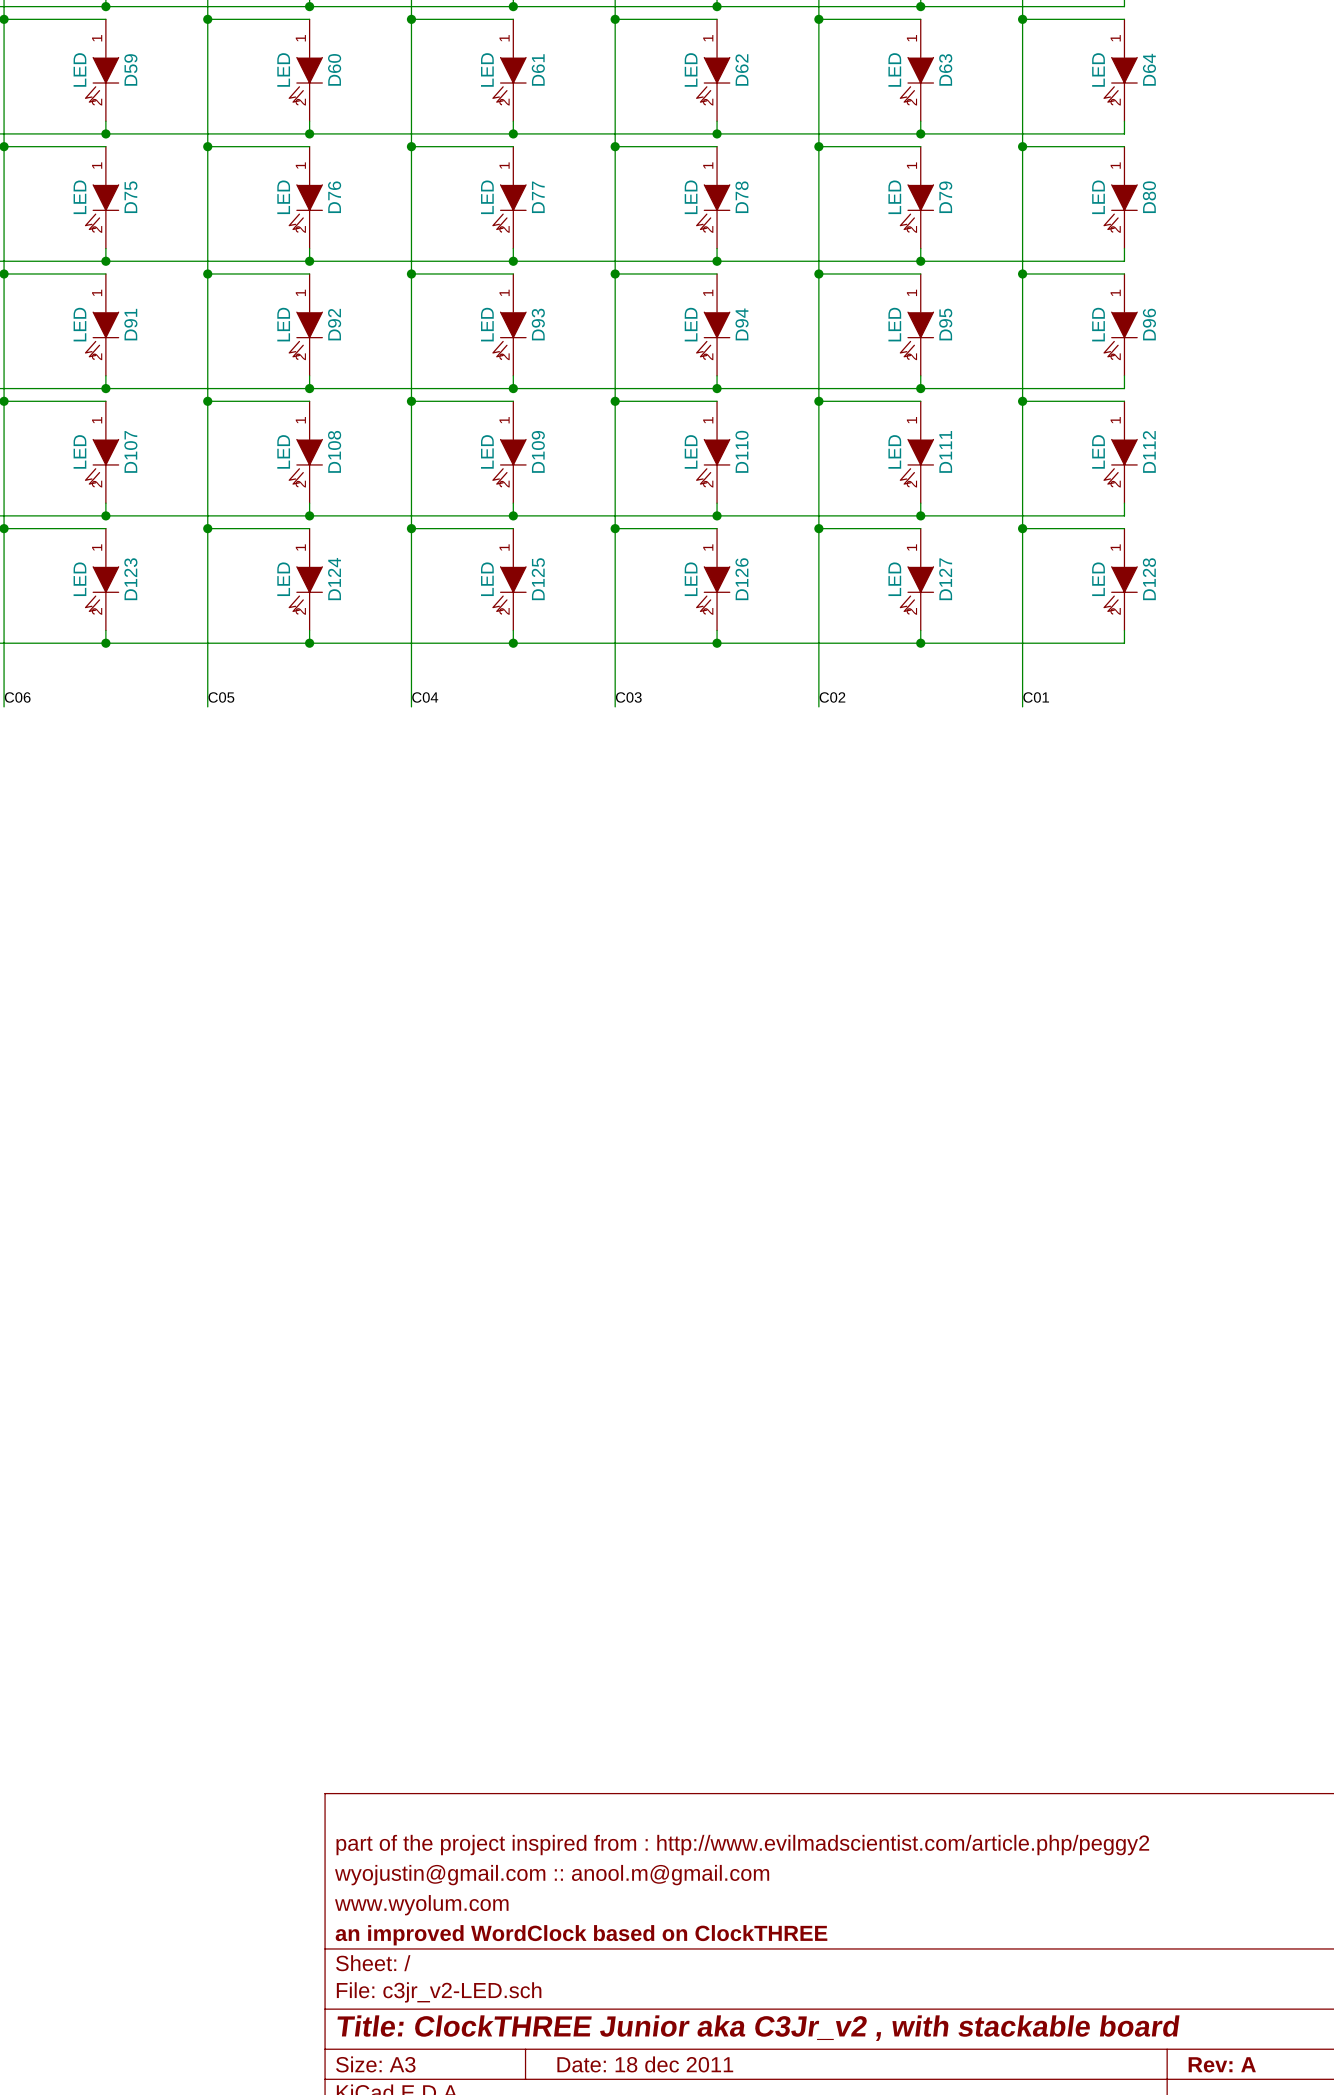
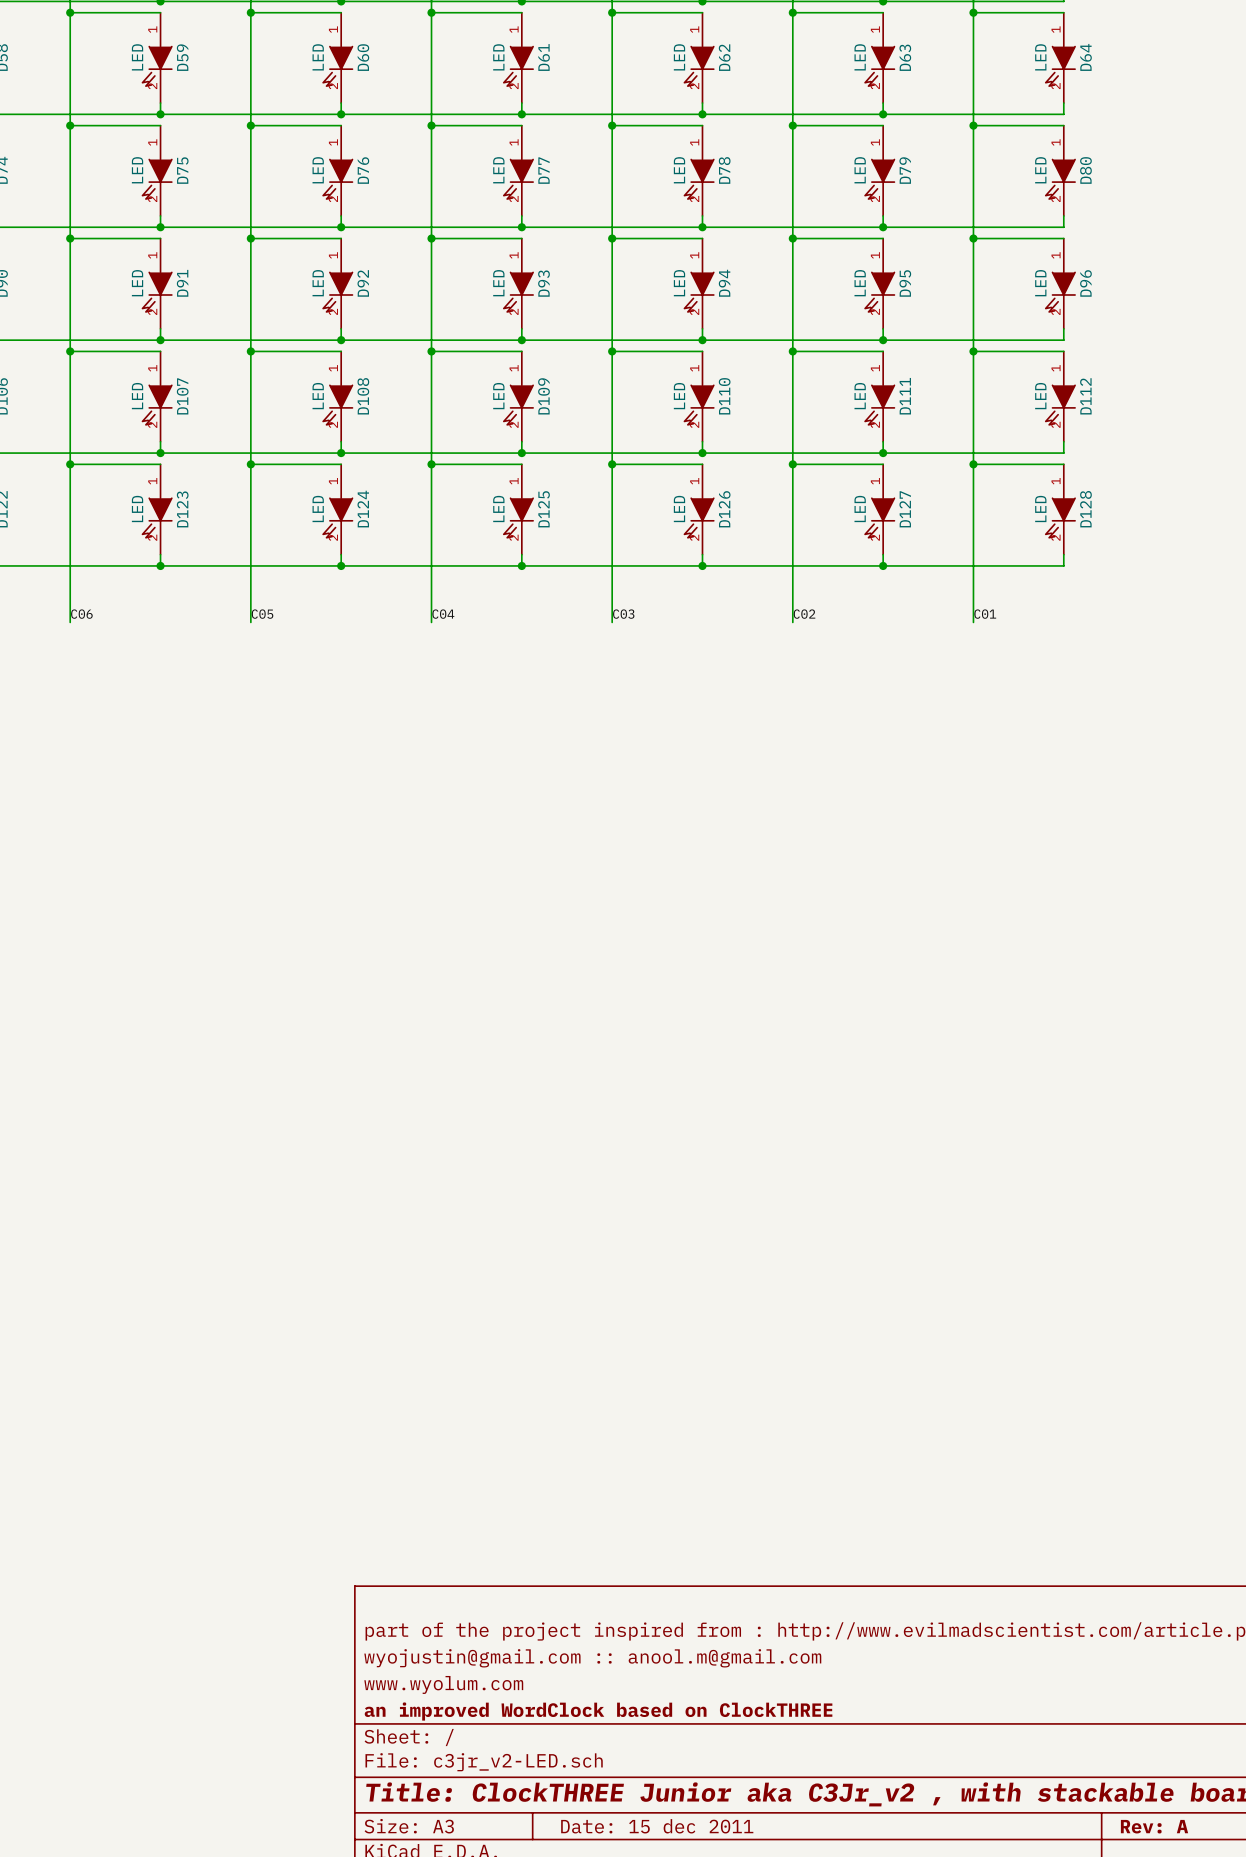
title block: Date: 18 dec 2011 (645, 2064) -> Date: 15 dec 2011 (657, 1826)

